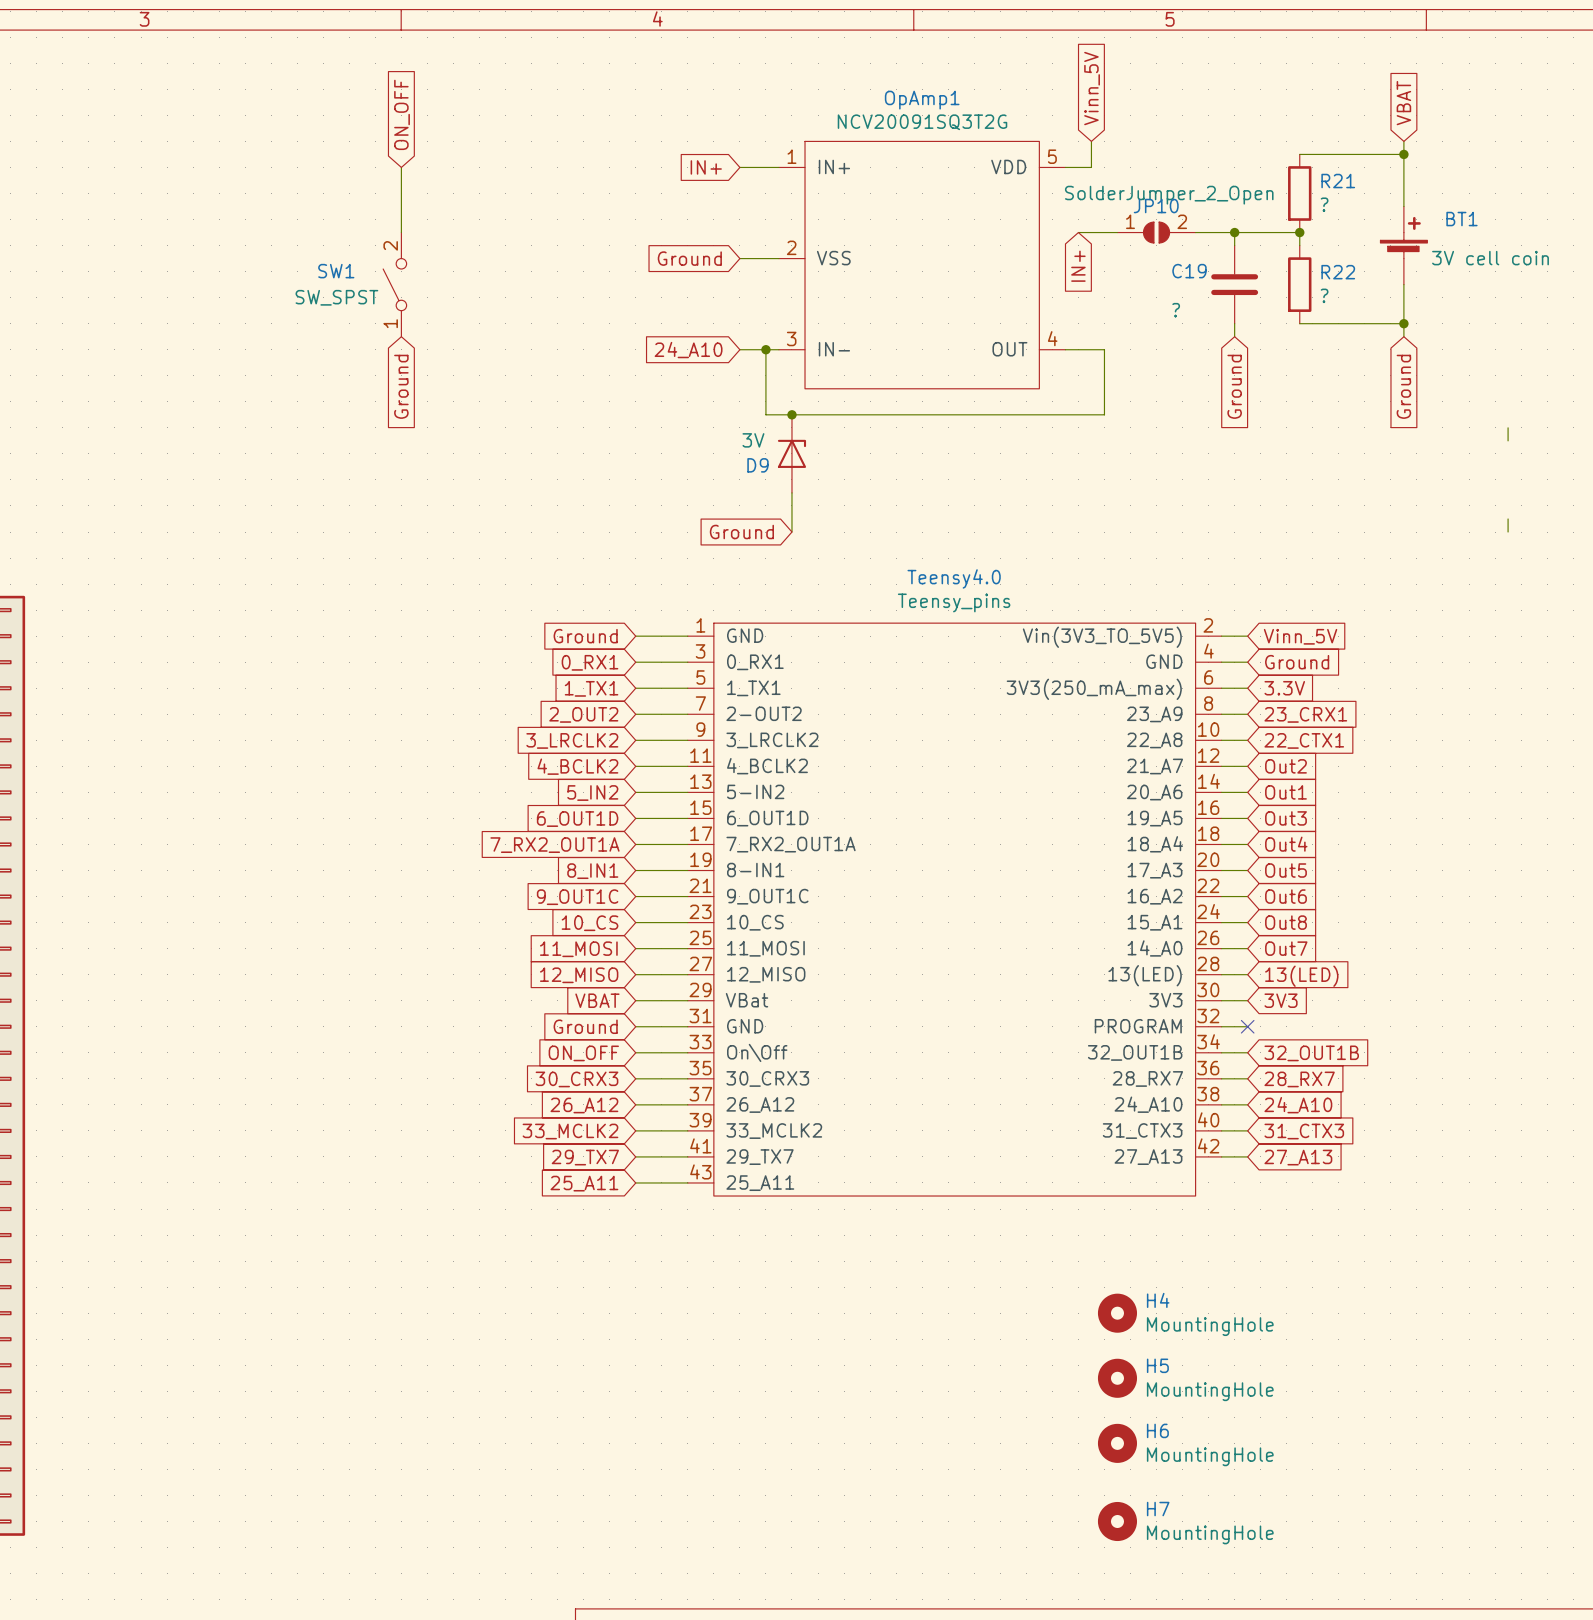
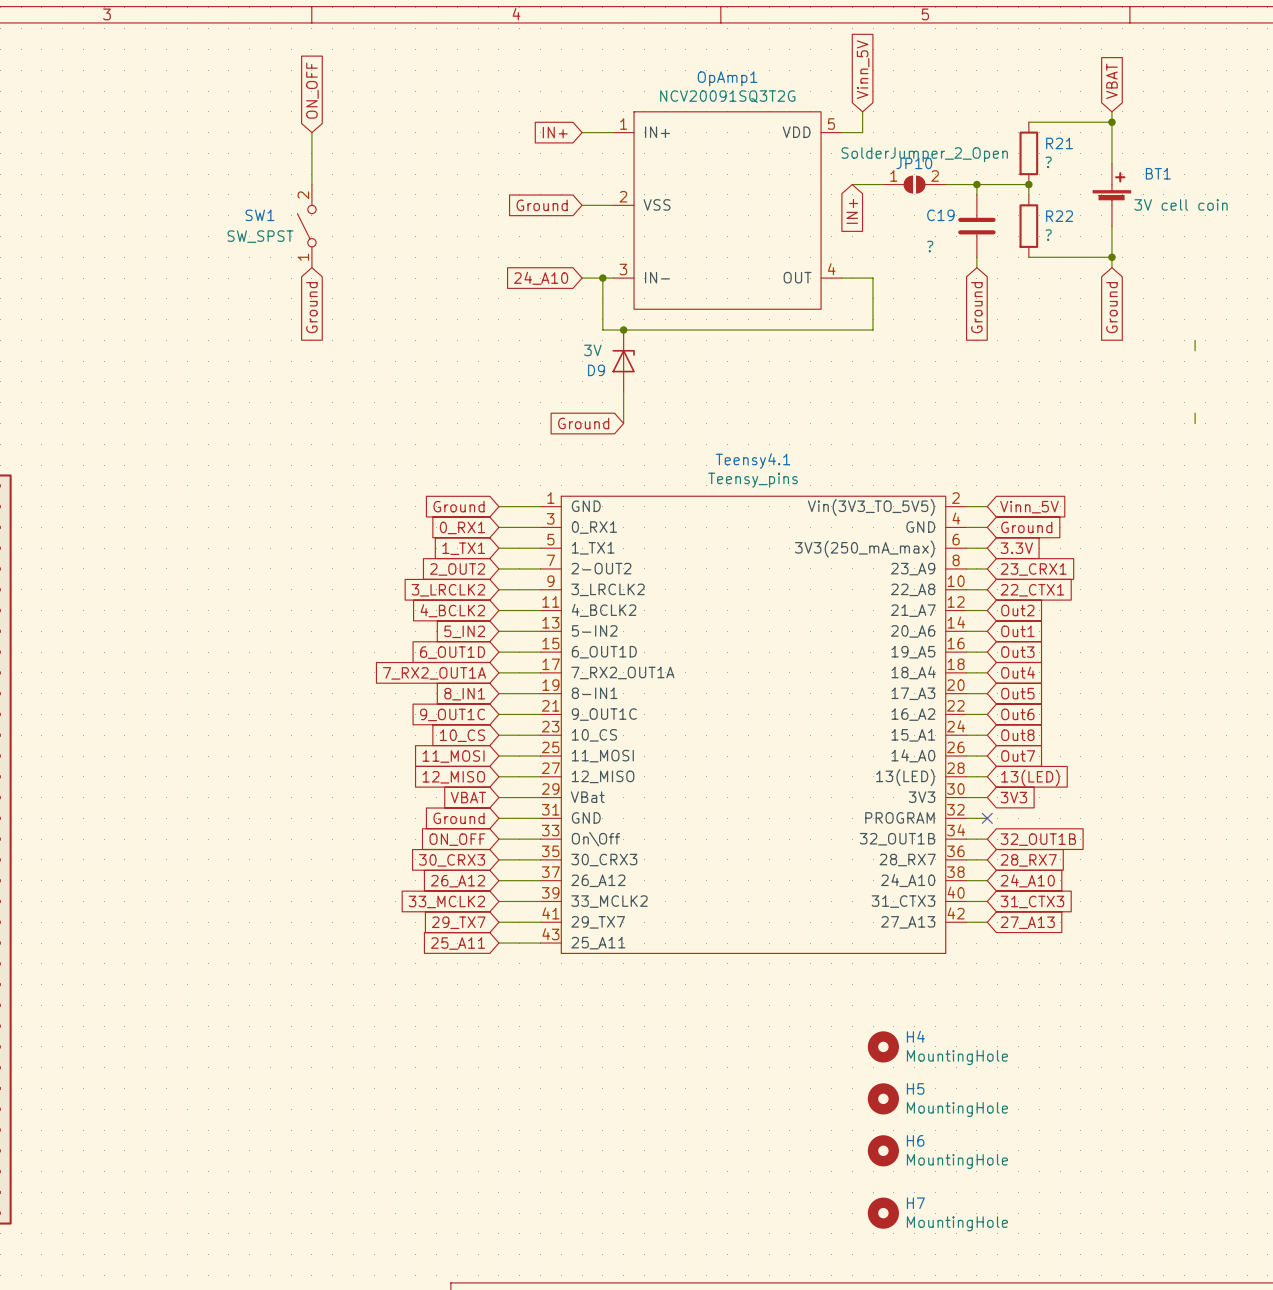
Teensy4.0 name: Teensy4.0 (954, 578) -> Teensy4.1 (753, 460)

